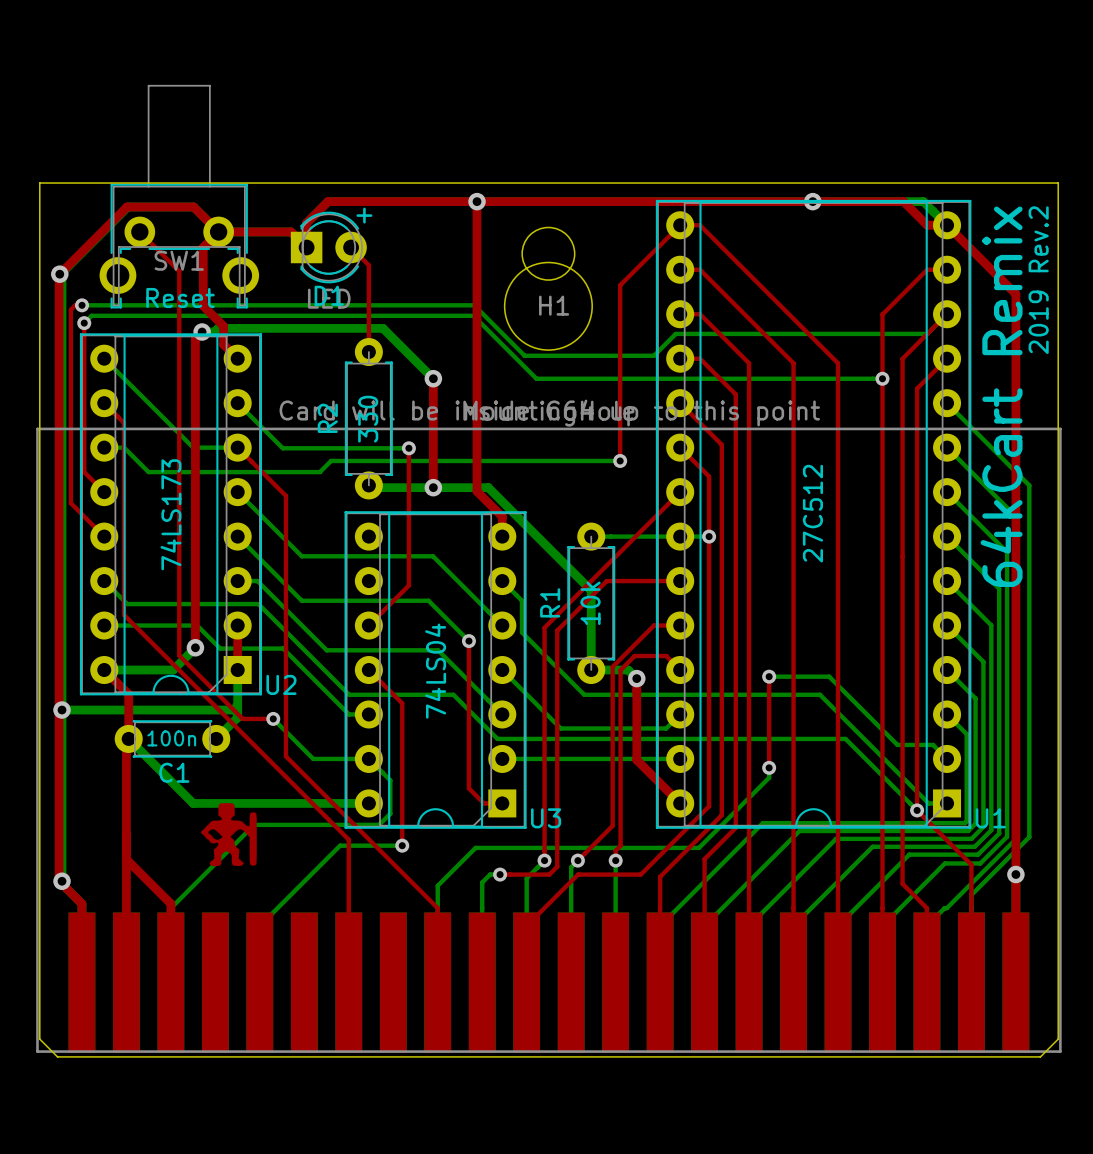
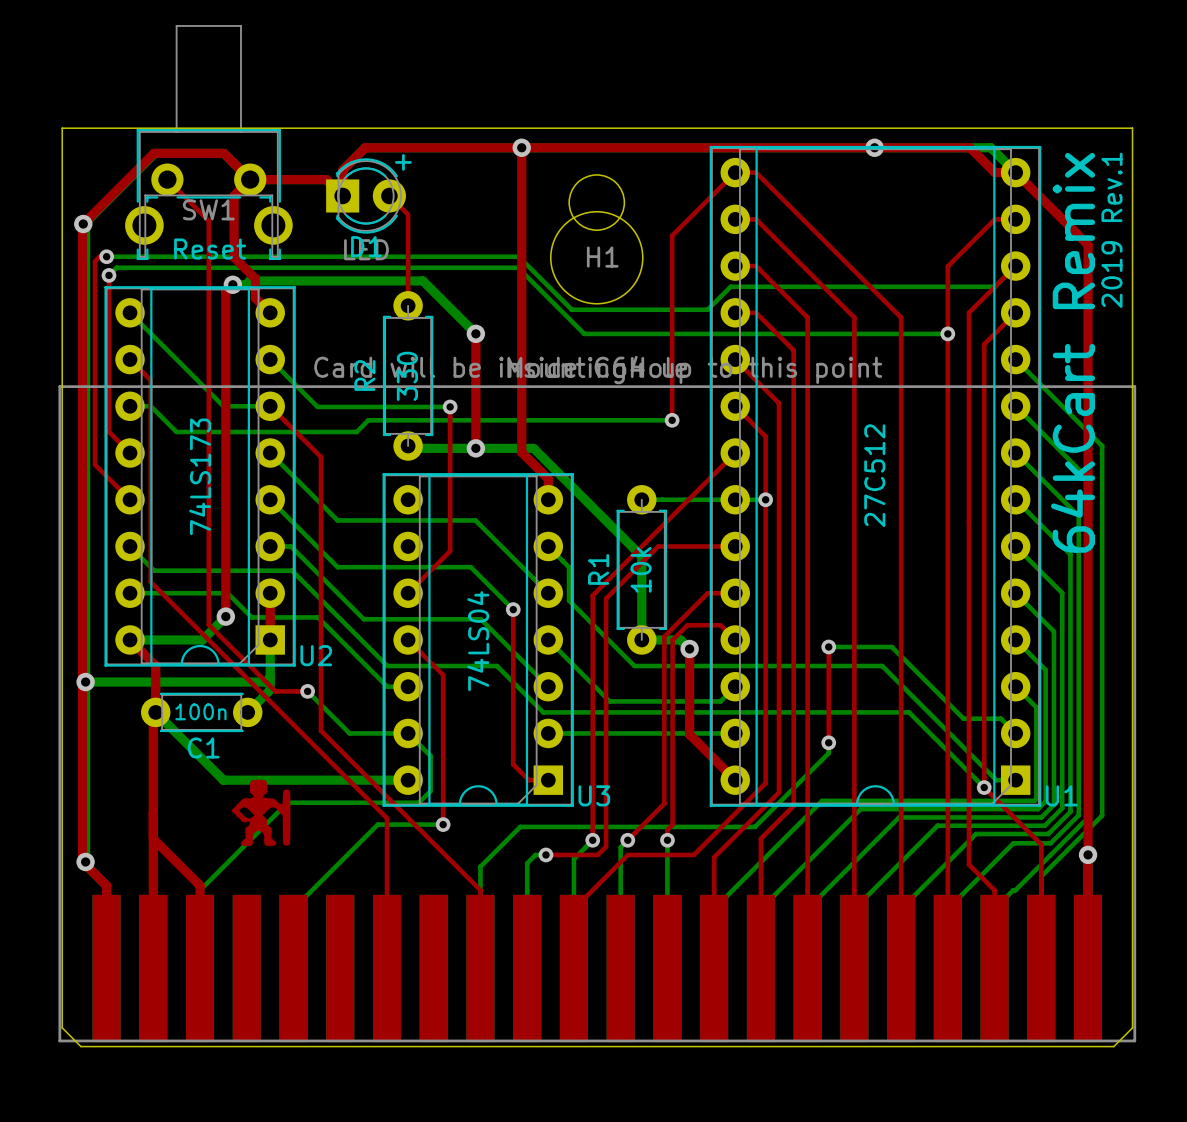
text: 2019 Rev.2 (1038, 280) -> 2019 Rev.1 (1111, 230)

